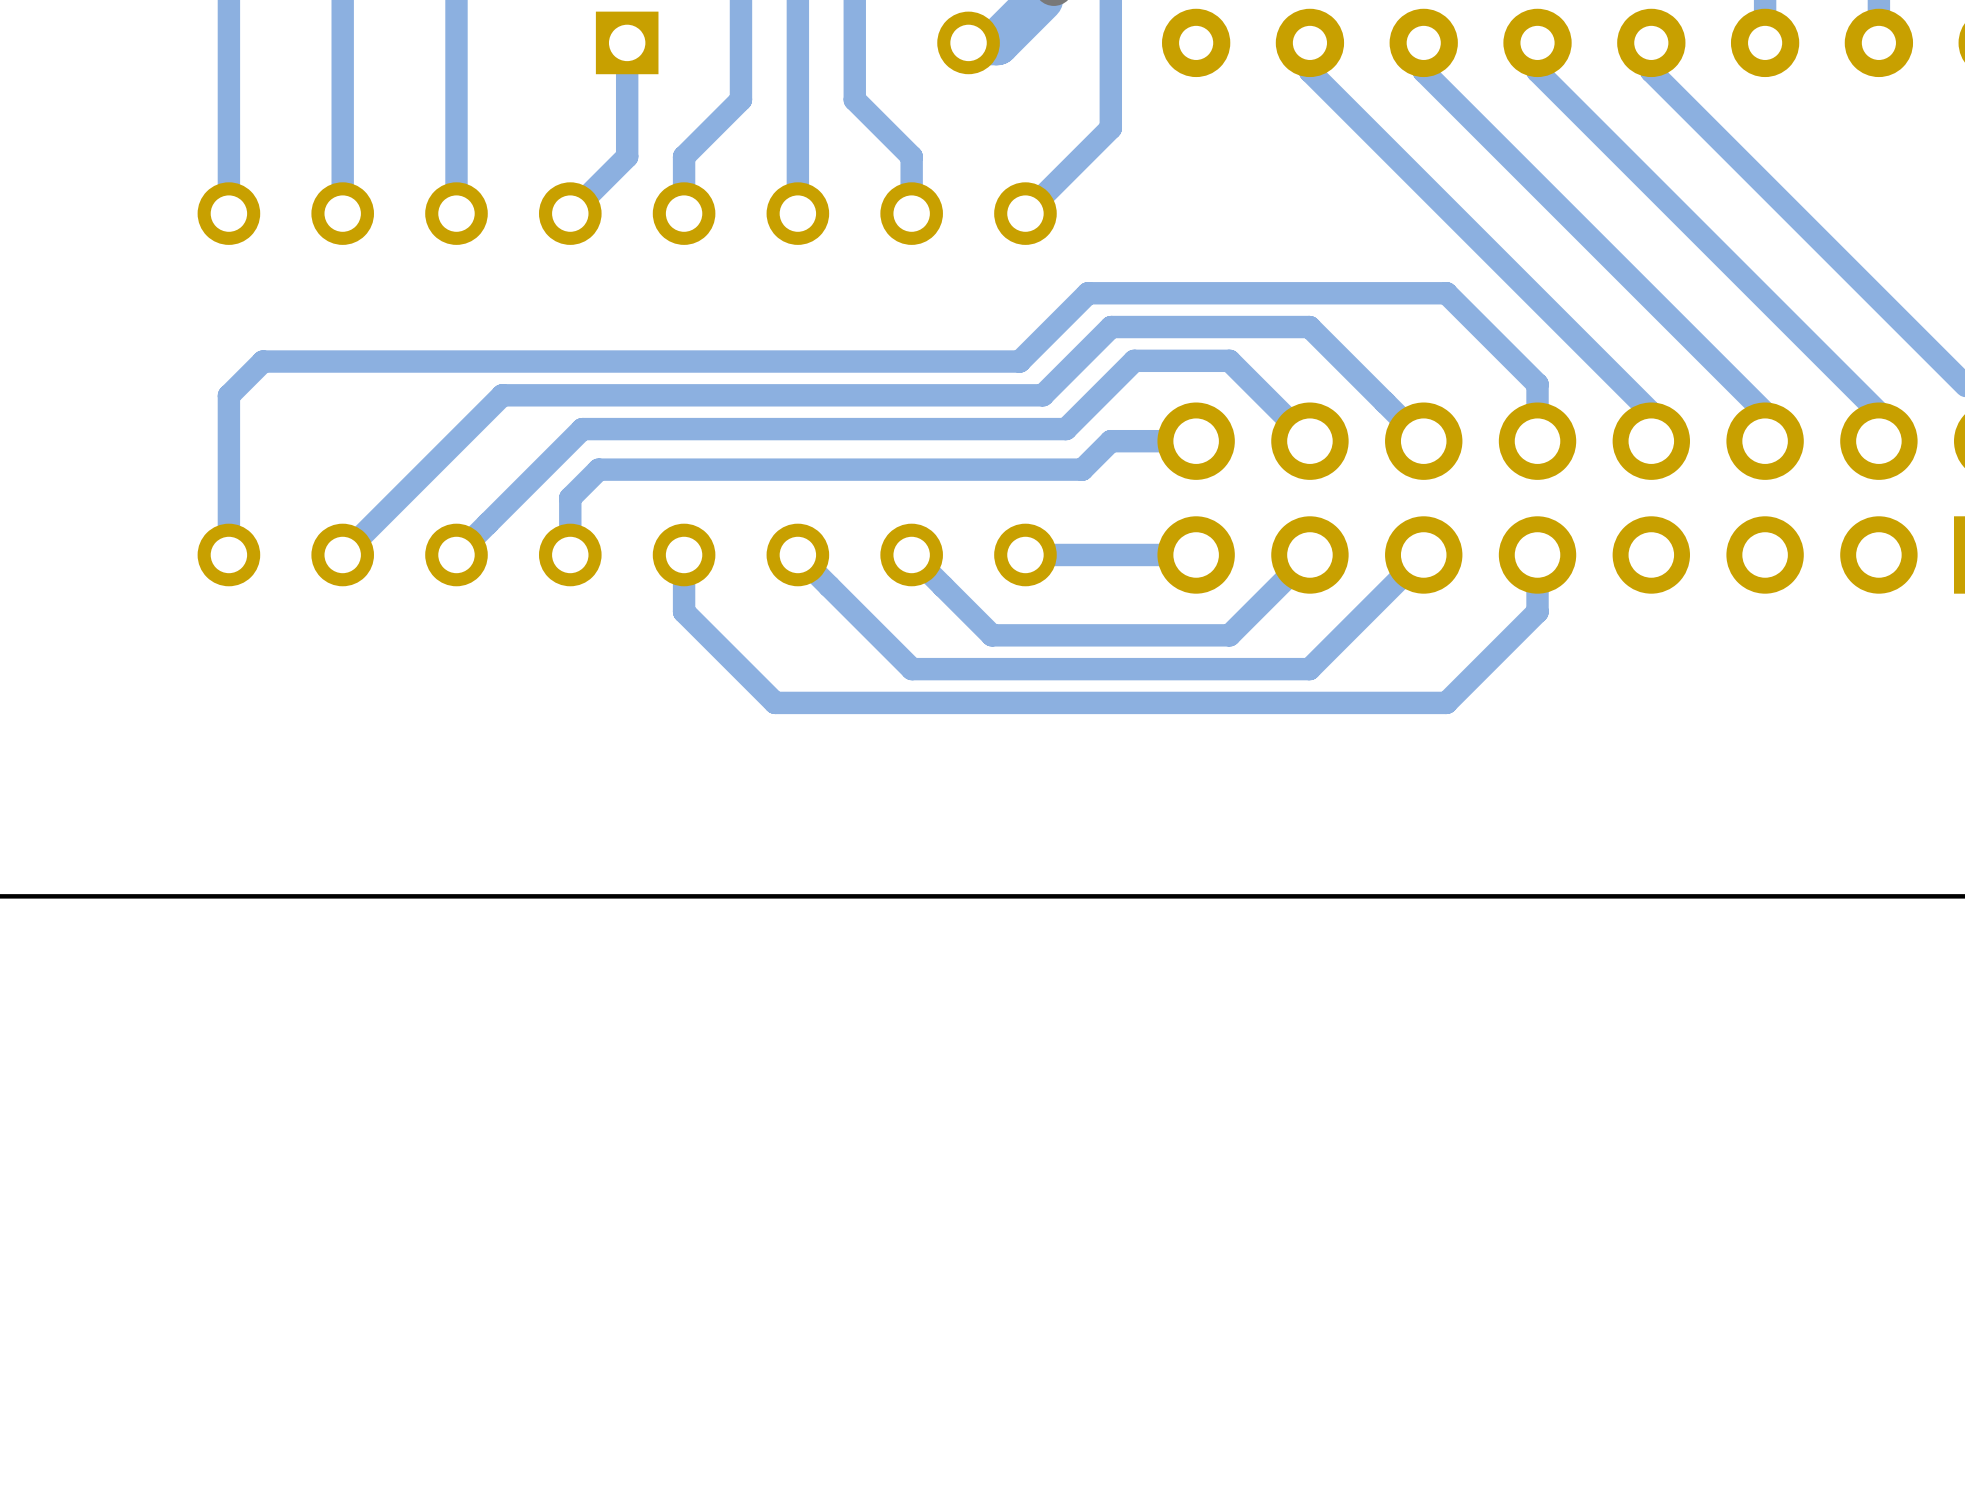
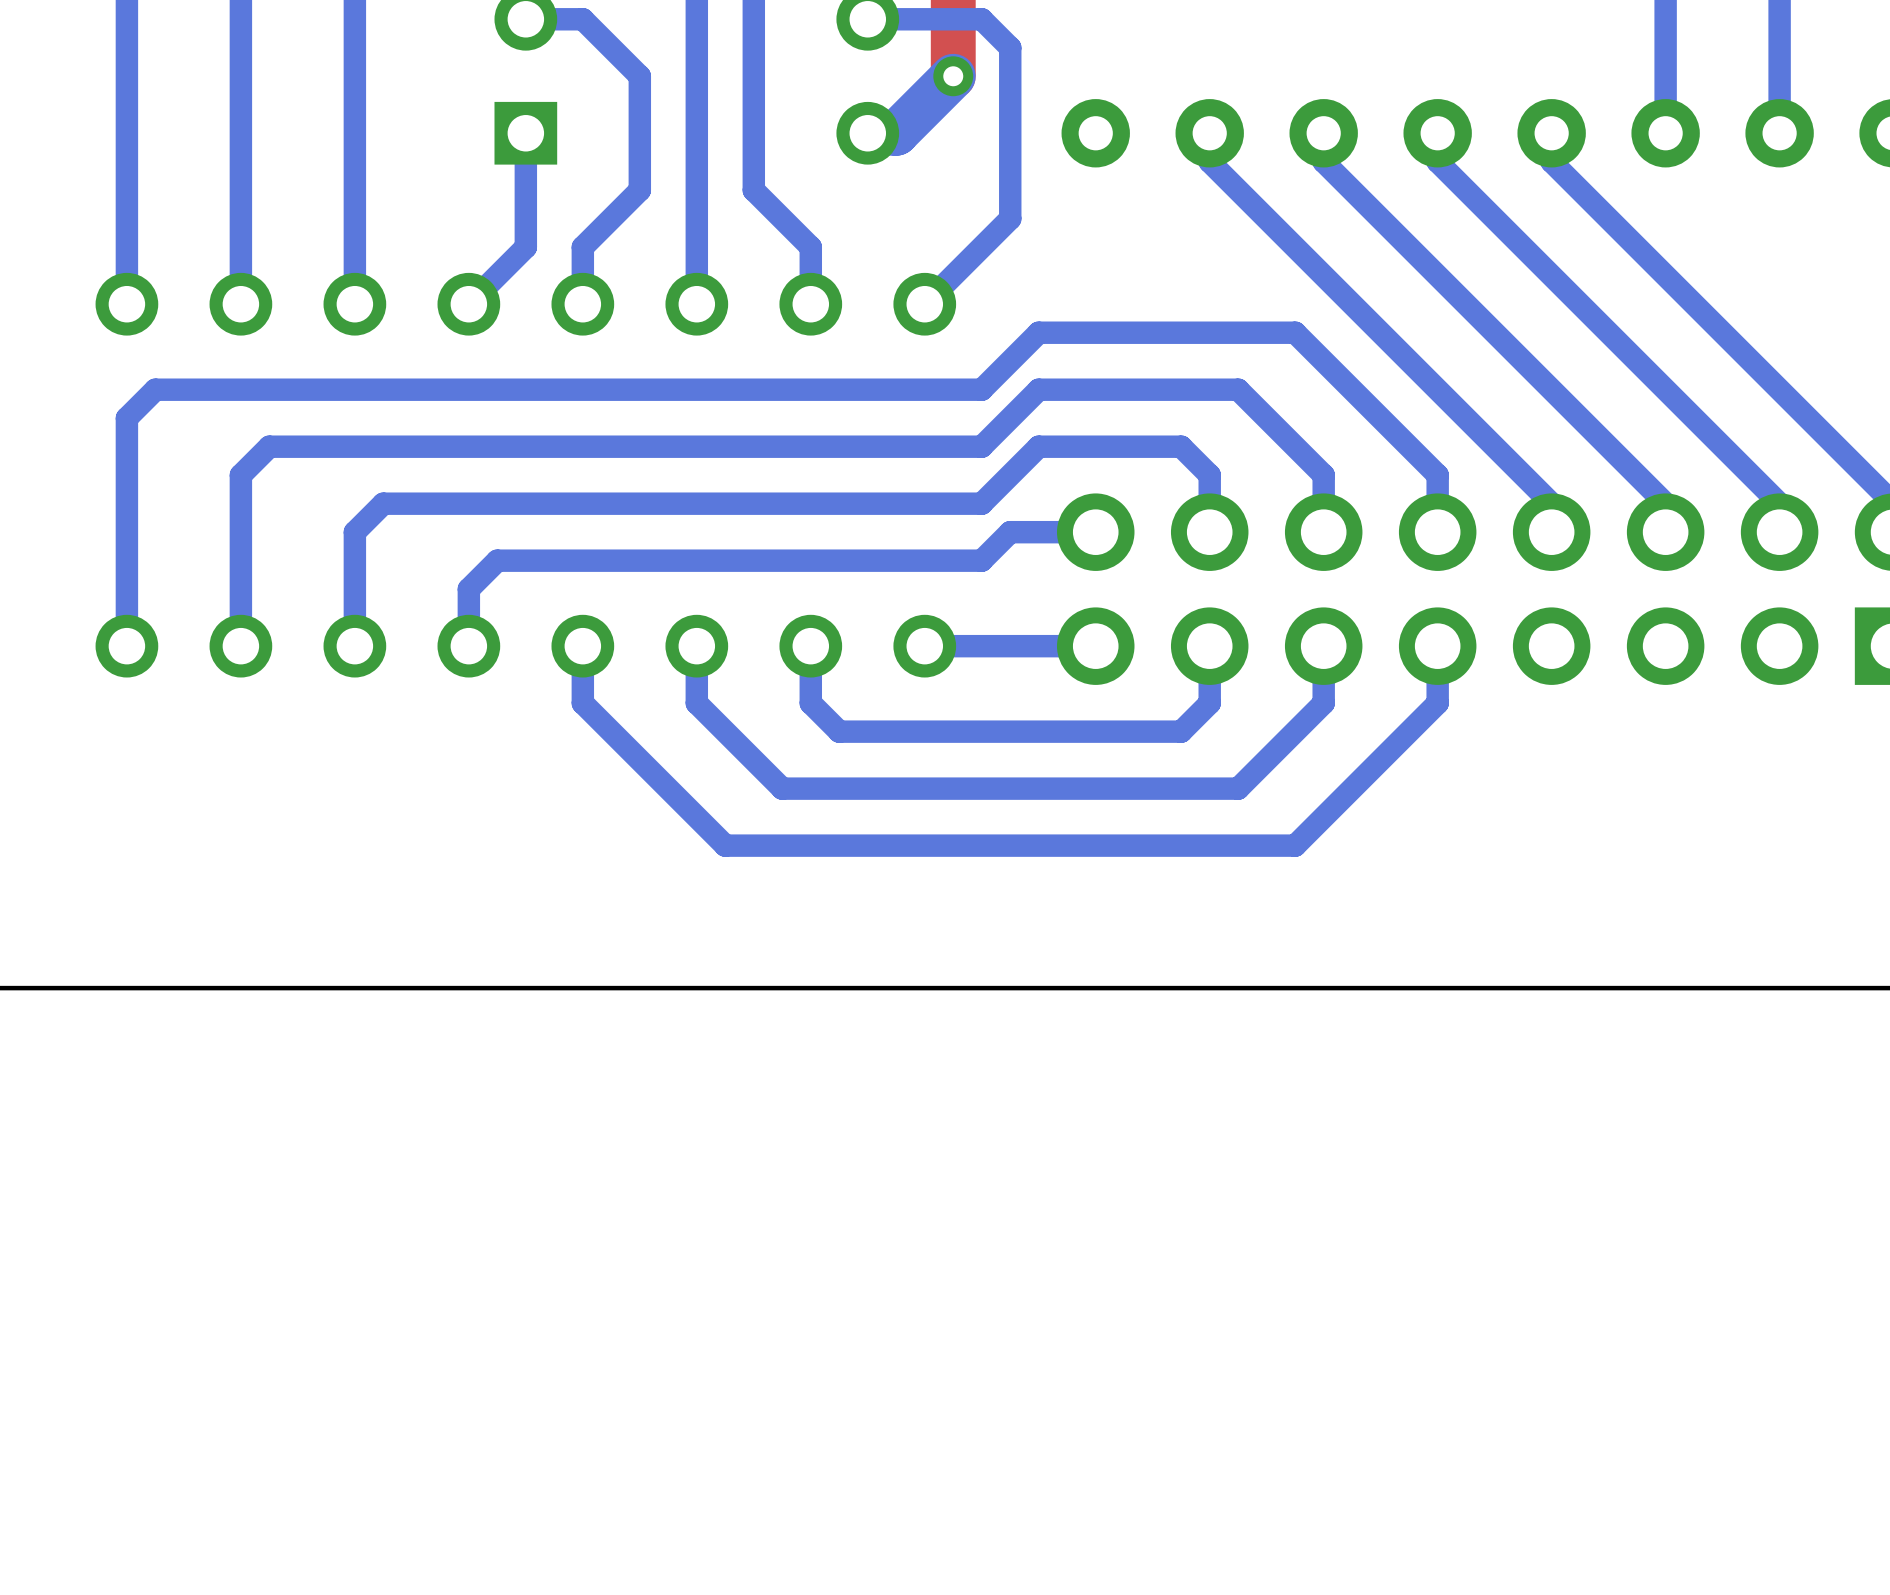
bottom track: (1446, 293) (1088, 293) -> (1346, 384) (1295, 332) (1038, 332) (987, 384)
bottom track: (1082, 298) (1019, 361) (263, 361) (228, 395) -> (981, 389) (155, 389) (126, 418) (126, 486)
bottom track: (1111, 327) (1309, 327) (1423, 441) -> (1010, 417) (1038, 389) (1238, 389) (1323, 475) (1323, 532)
bottom track: (1082, 355) (1042, 395) (502, 395) (484, 412) -> (981, 503) (383, 503)
bottom track: none -> (981, 446) (269, 446) (240, 475) (240, 646)
bottom track: (1134, 360) (1229, 360) (1309, 441) -> (1033, 451) (1038, 446) (1181, 446) (1209, 475) (1209, 532)
bottom track: (1082, 412) (1066, 429) (582, 429) (456, 554) -> none
bottom track: (456, 441) (354, 543) -> (354, 532) (354, 646)
bottom track: (1309, 554) (1229, 635) (992, 635) (911, 554) -> (1209, 646) (1209, 703) (1181, 731) (839, 731) (810, 703) (810, 646)
bottom track: (1423, 554) (1309, 669) (912, 669) (797, 554) -> (1323, 646) (1323, 703) (1238, 788) (782, 788) (696, 703) (696, 646)
bottom track: (1446, 702) (775, 702) -> (1346, 794) (1295, 845) (725, 845) (674, 794)

